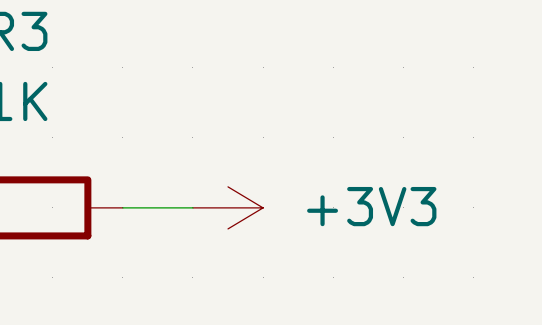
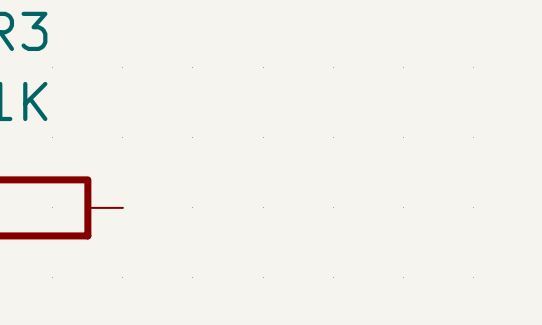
wire: (122, 207) (192, 207) -> none
power symbol: +3V3 (228, 207) -> none

